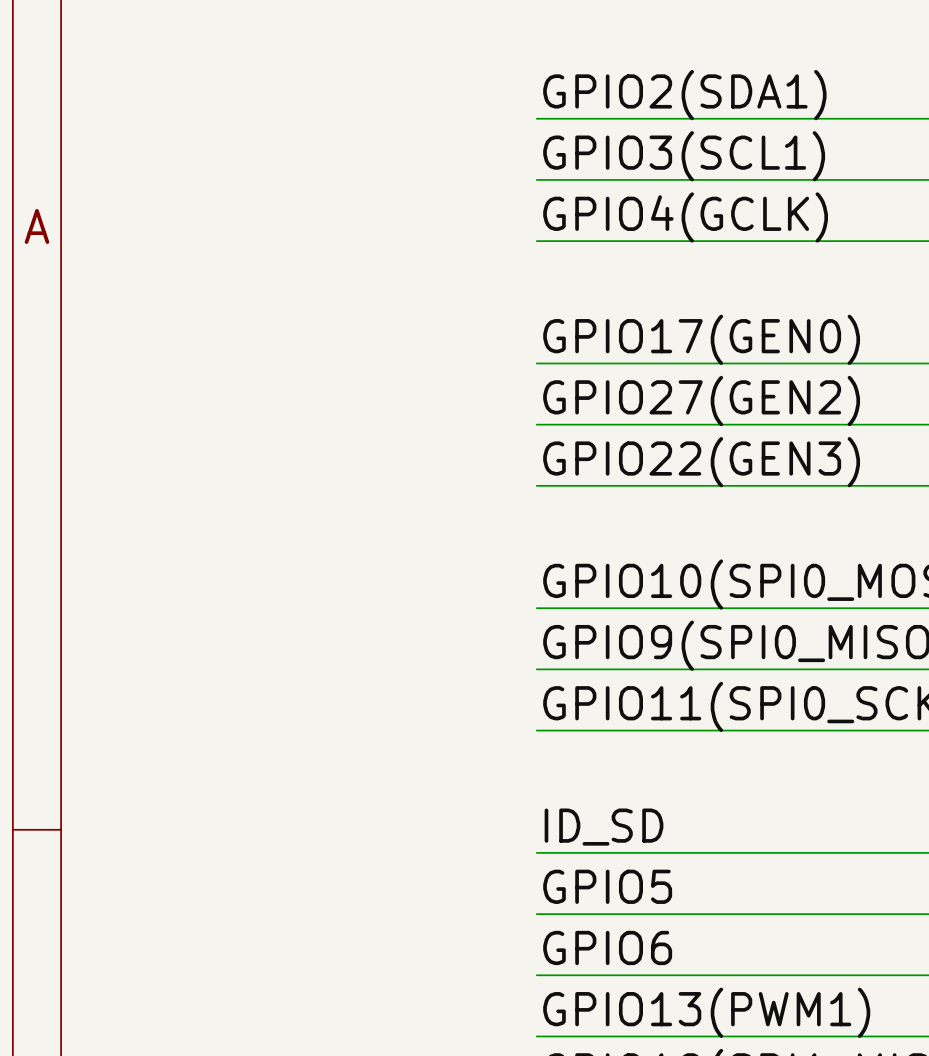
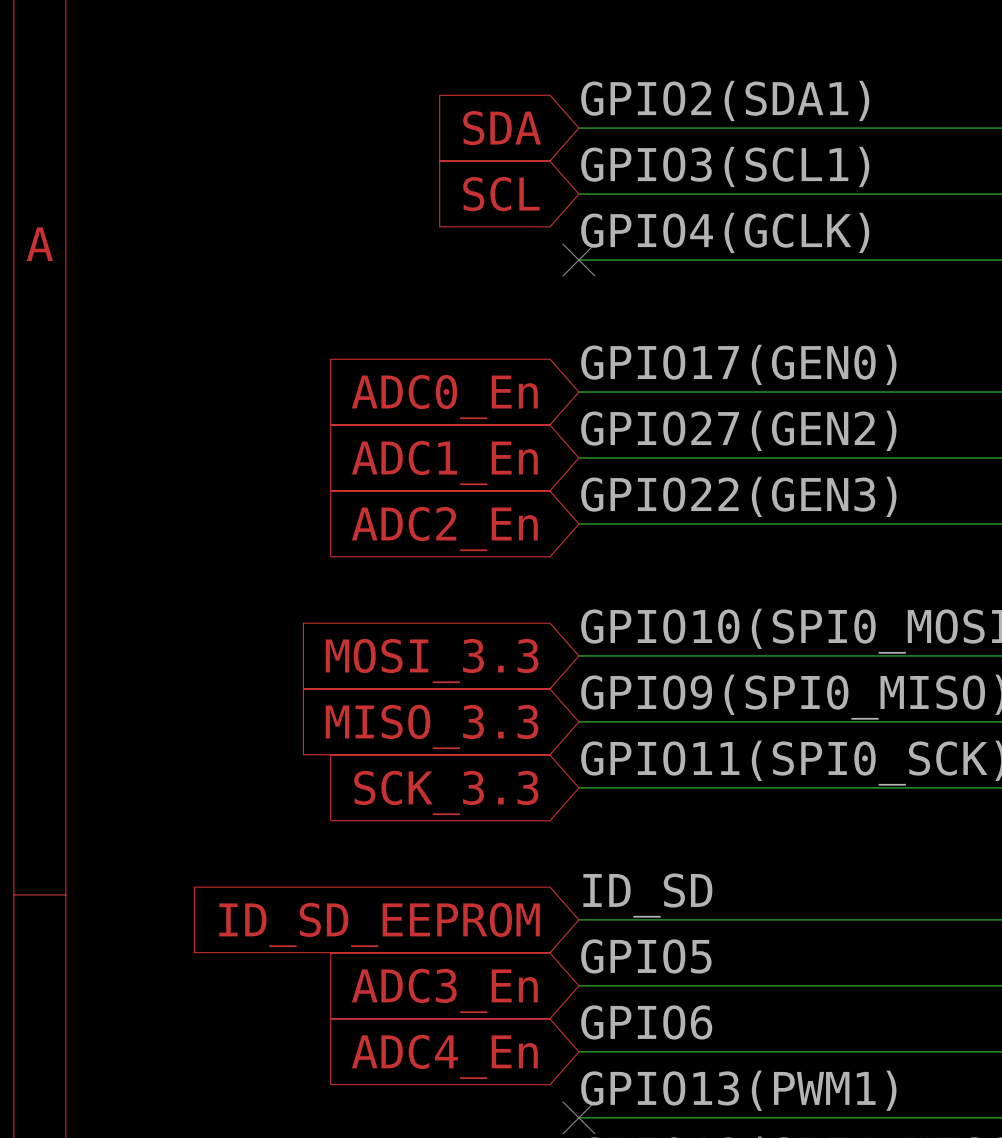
global label: none -> SDA (502, 128)
global label: none -> SCL (501, 194)
no-connect mark: none -> (578, 260)
global label: none -> ADC0_En (444, 397)
global label: none -> ADC1_En (444, 463)
global label: none -> ADC2_En (444, 529)
global label: none -> MOSI_3.3 (432, 661)
global label: none -> MISO_3.3 (432, 726)
global label: none -> SCK_3.3 (446, 792)
global label: none -> ID_SD_EEPROM (379, 924)
global label: none -> ADC3_En (444, 990)
global label: none -> ADC4_En (444, 1056)
no-connect mark: none -> (578, 1117)

